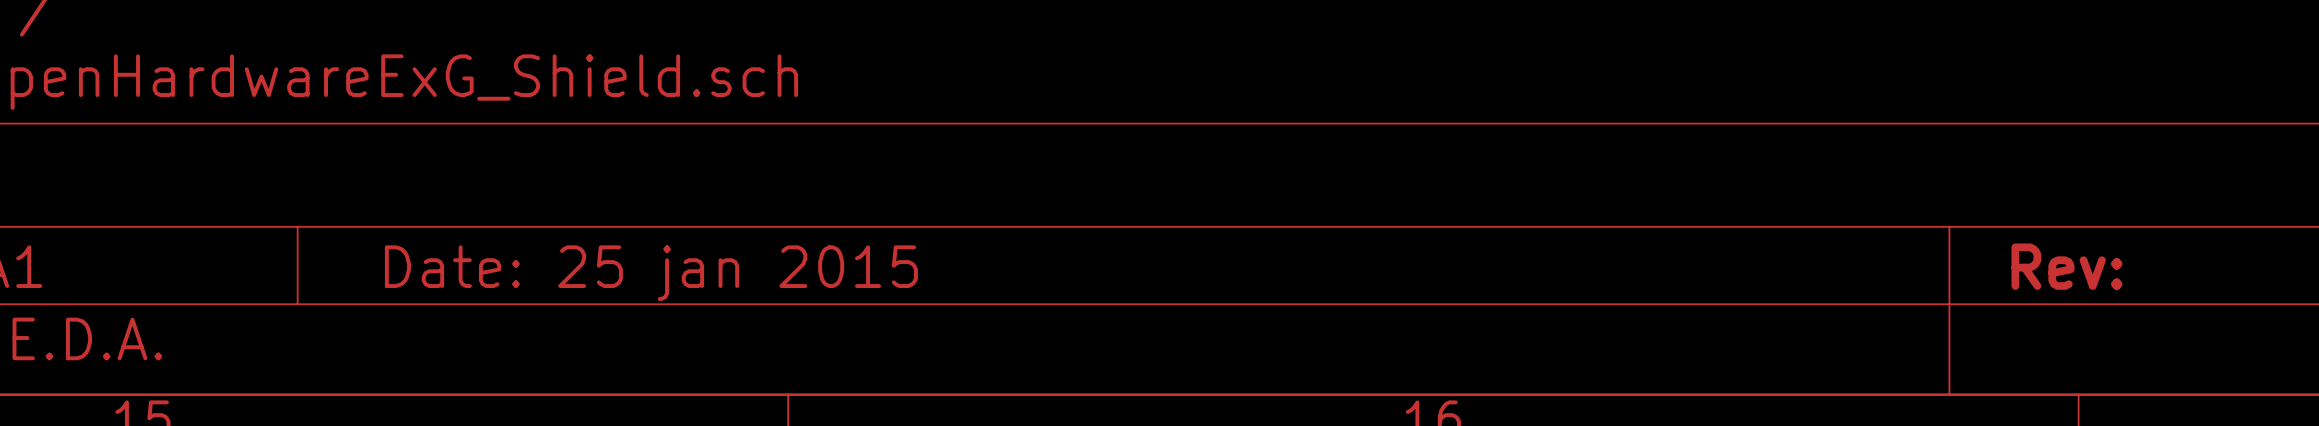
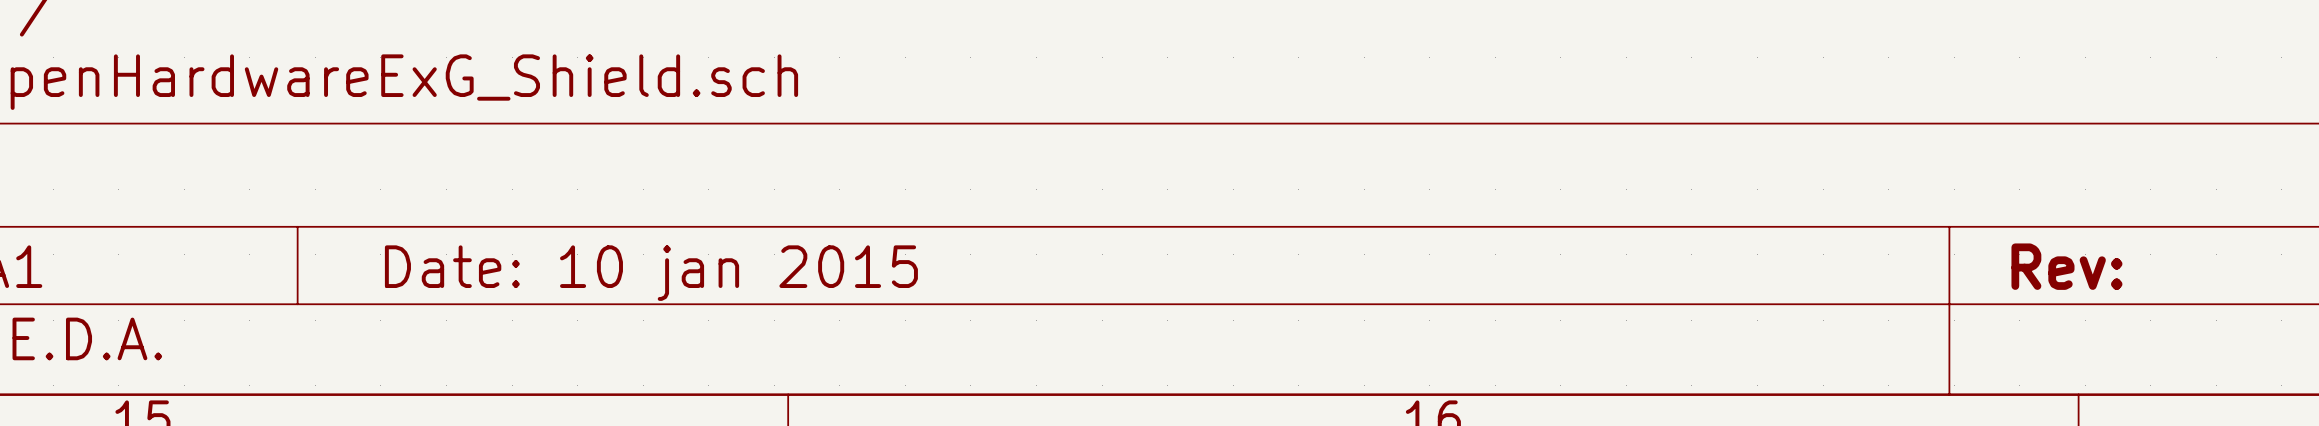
title block: Date: 25 jan 2015 (651, 273) -> Date: 10 jan 2015 (651, 273)

